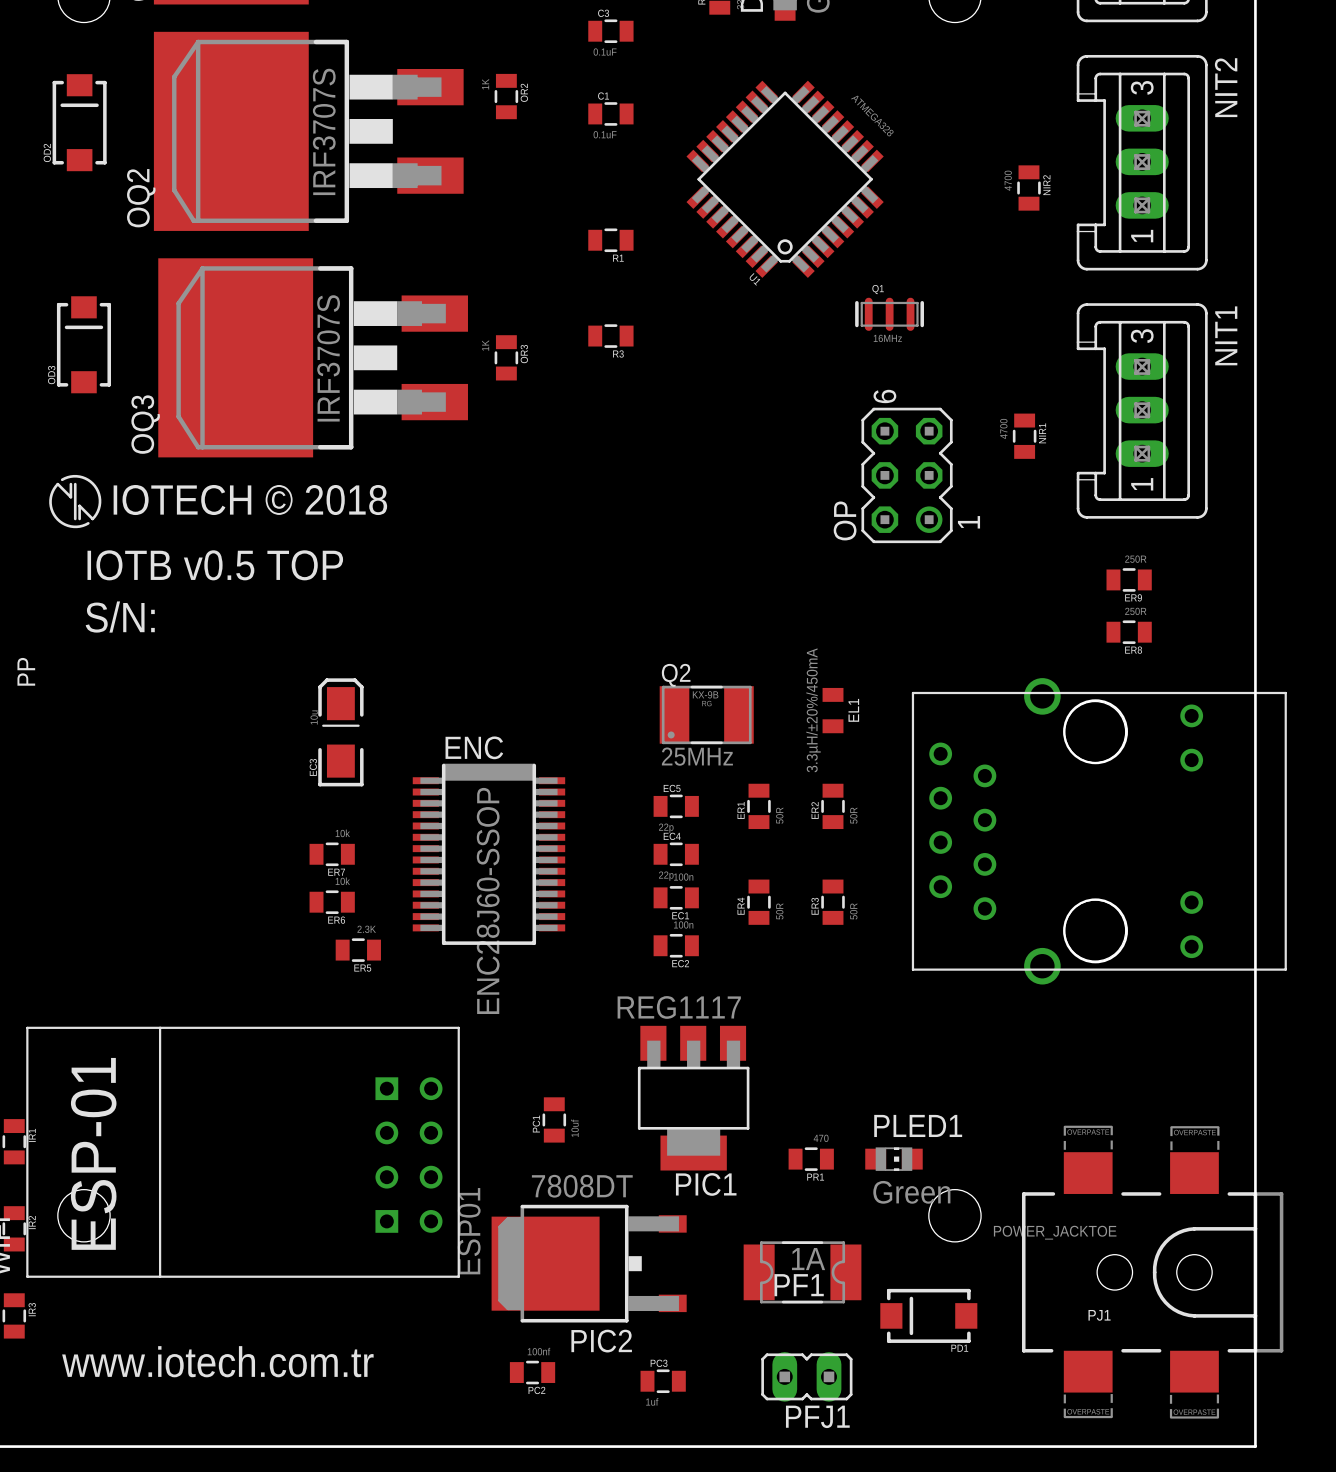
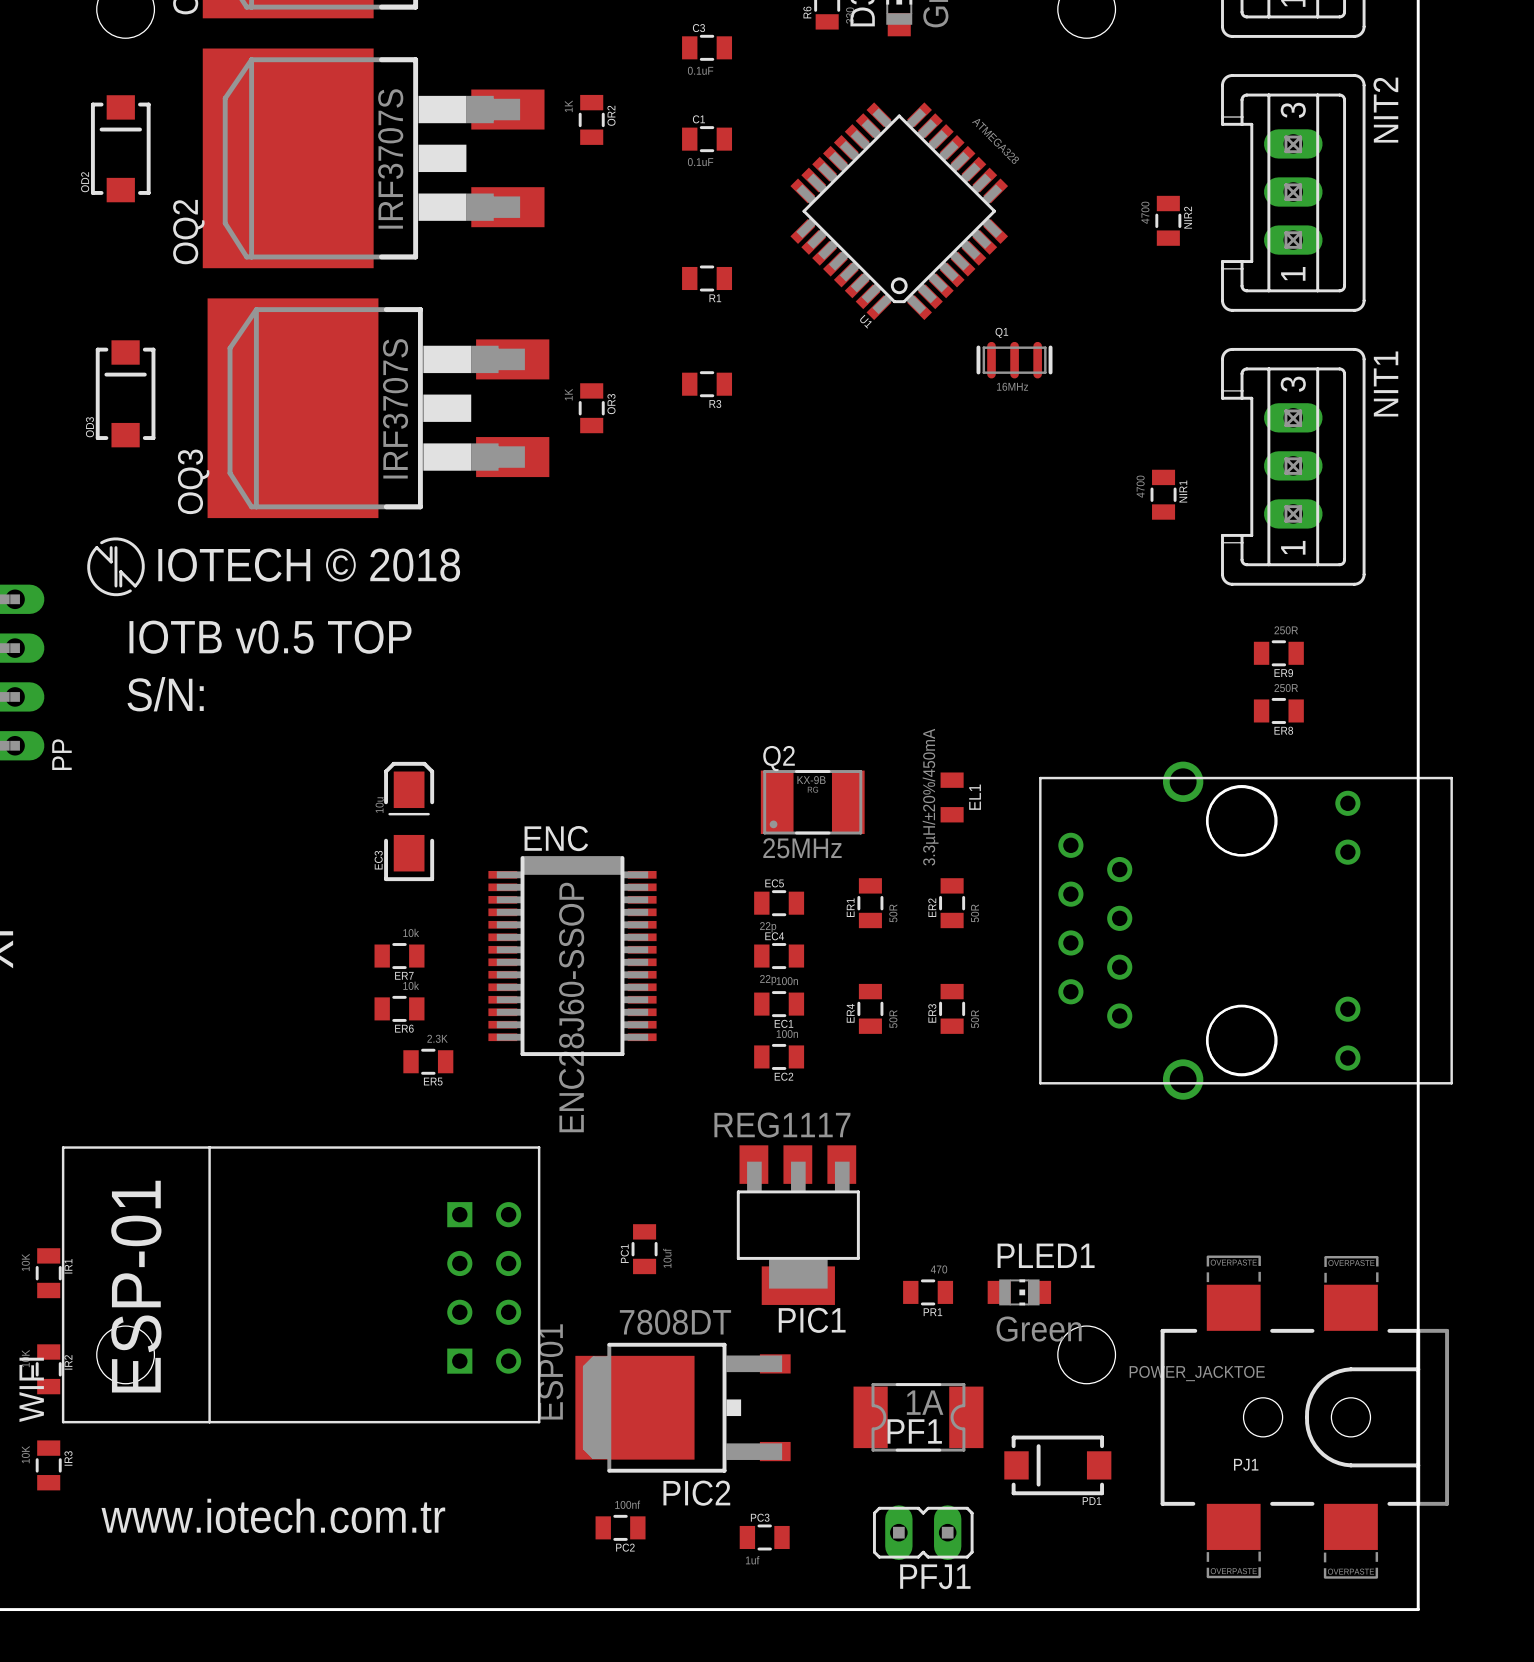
OP: (907, 475) -> none

